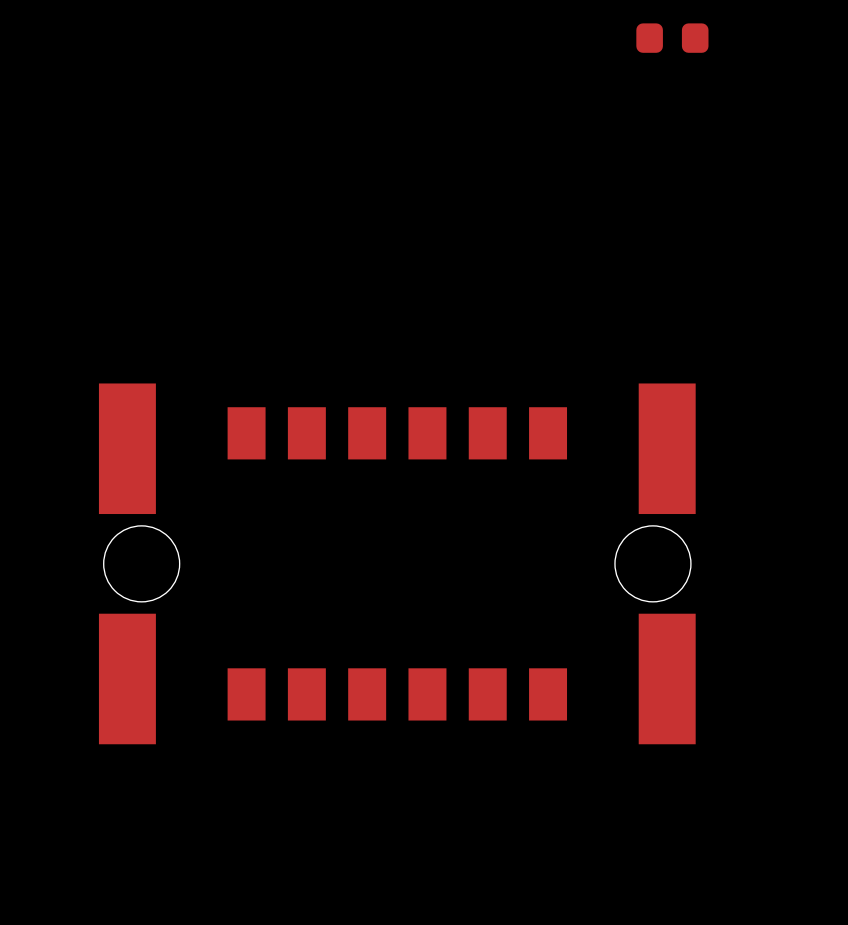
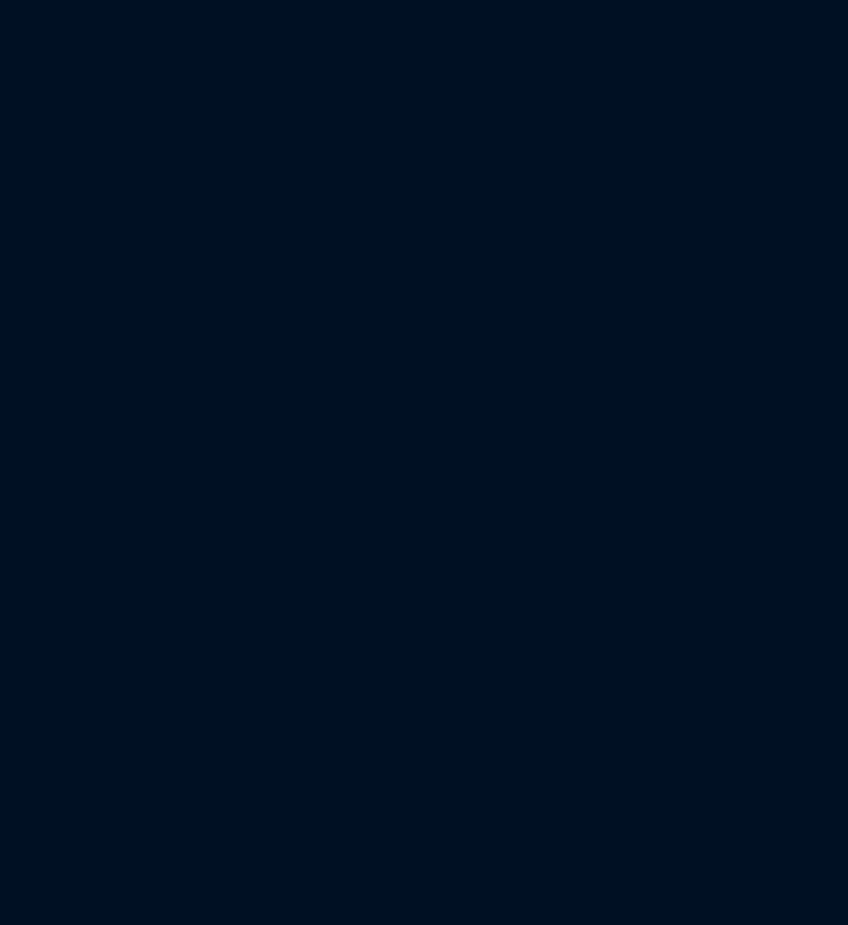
part: (672, 38) -> none
part: (397, 563) -> none

